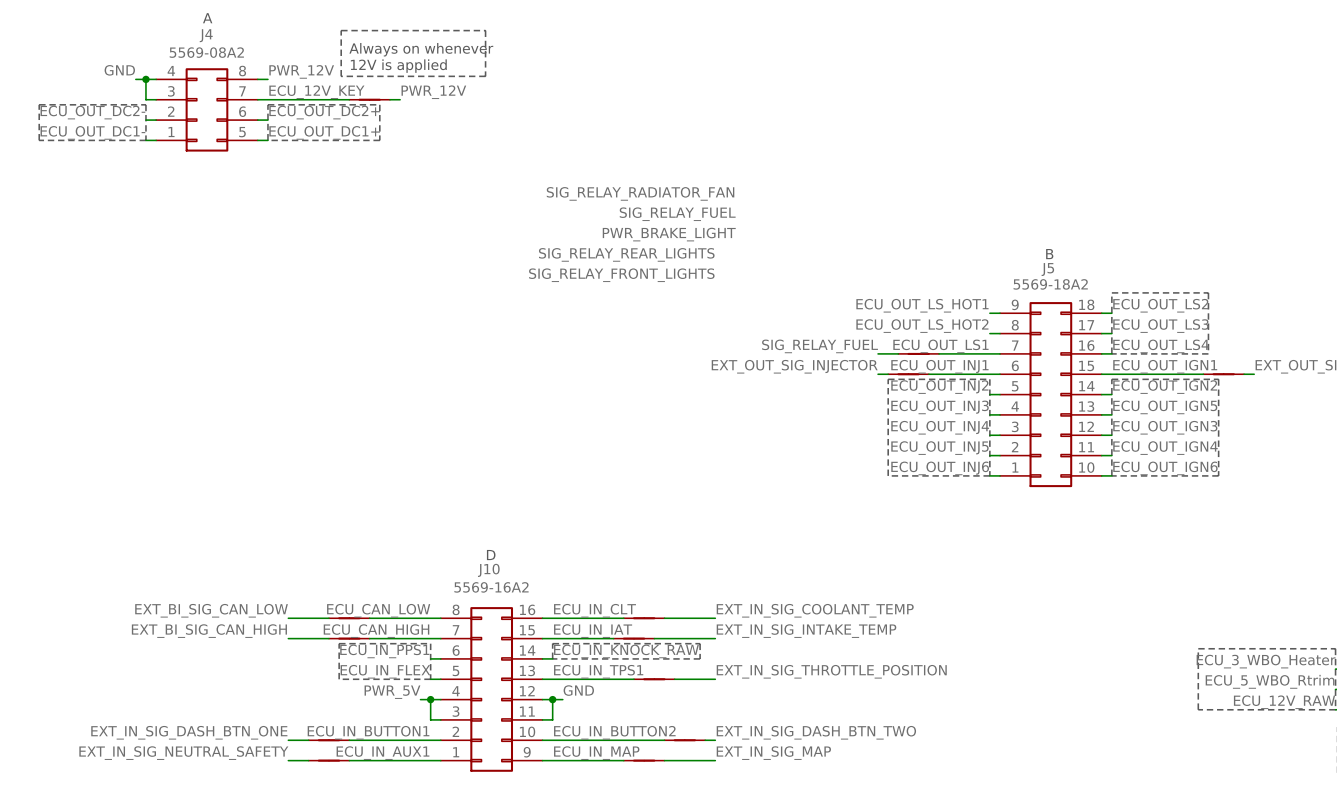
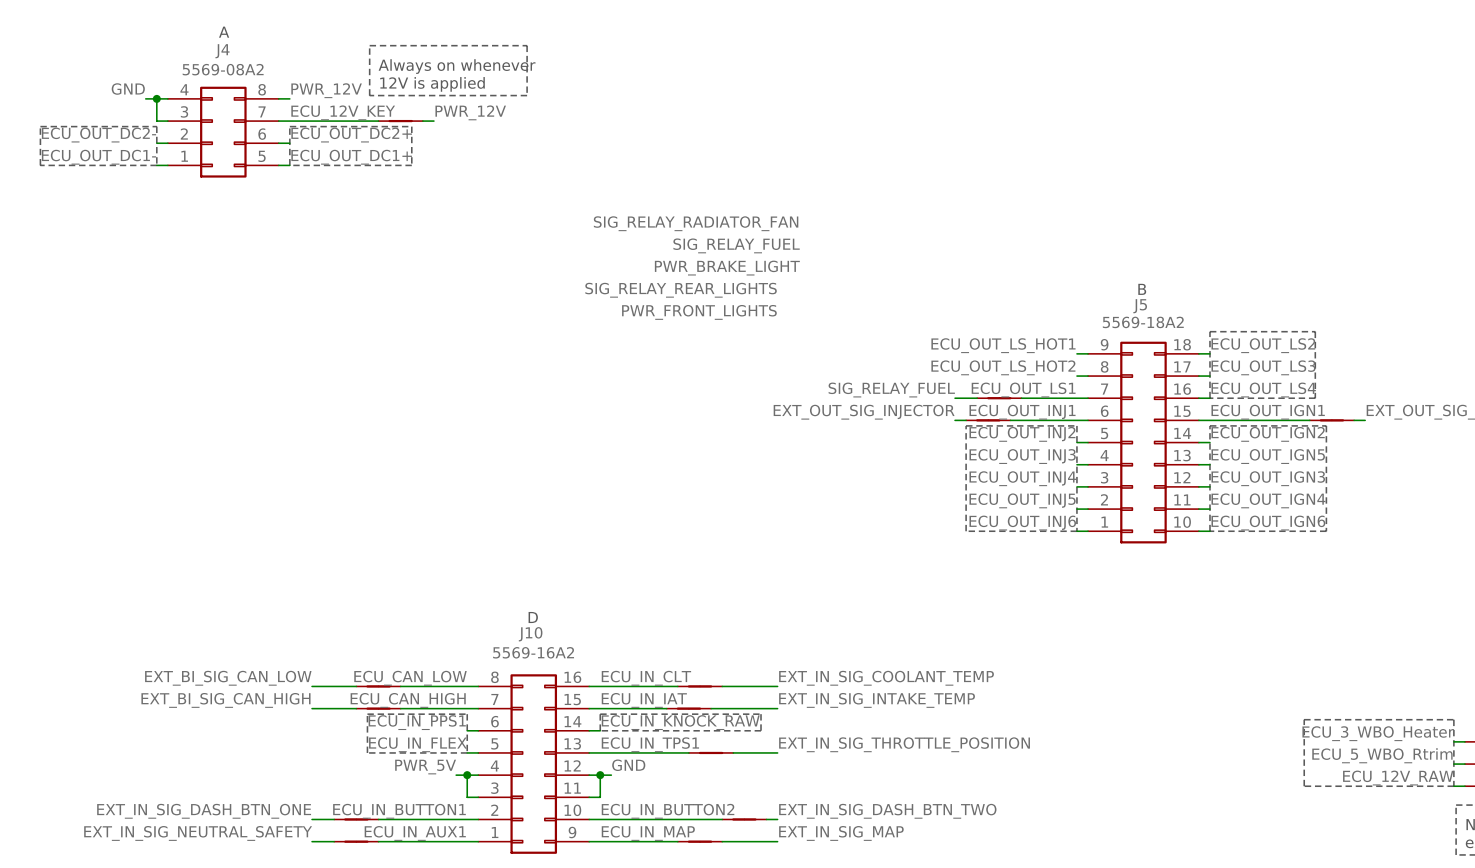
label: SIG_RELAY_FRONT_LIGHTS (621, 275) -> PWR_FRONT_LIGHTS (699, 312)

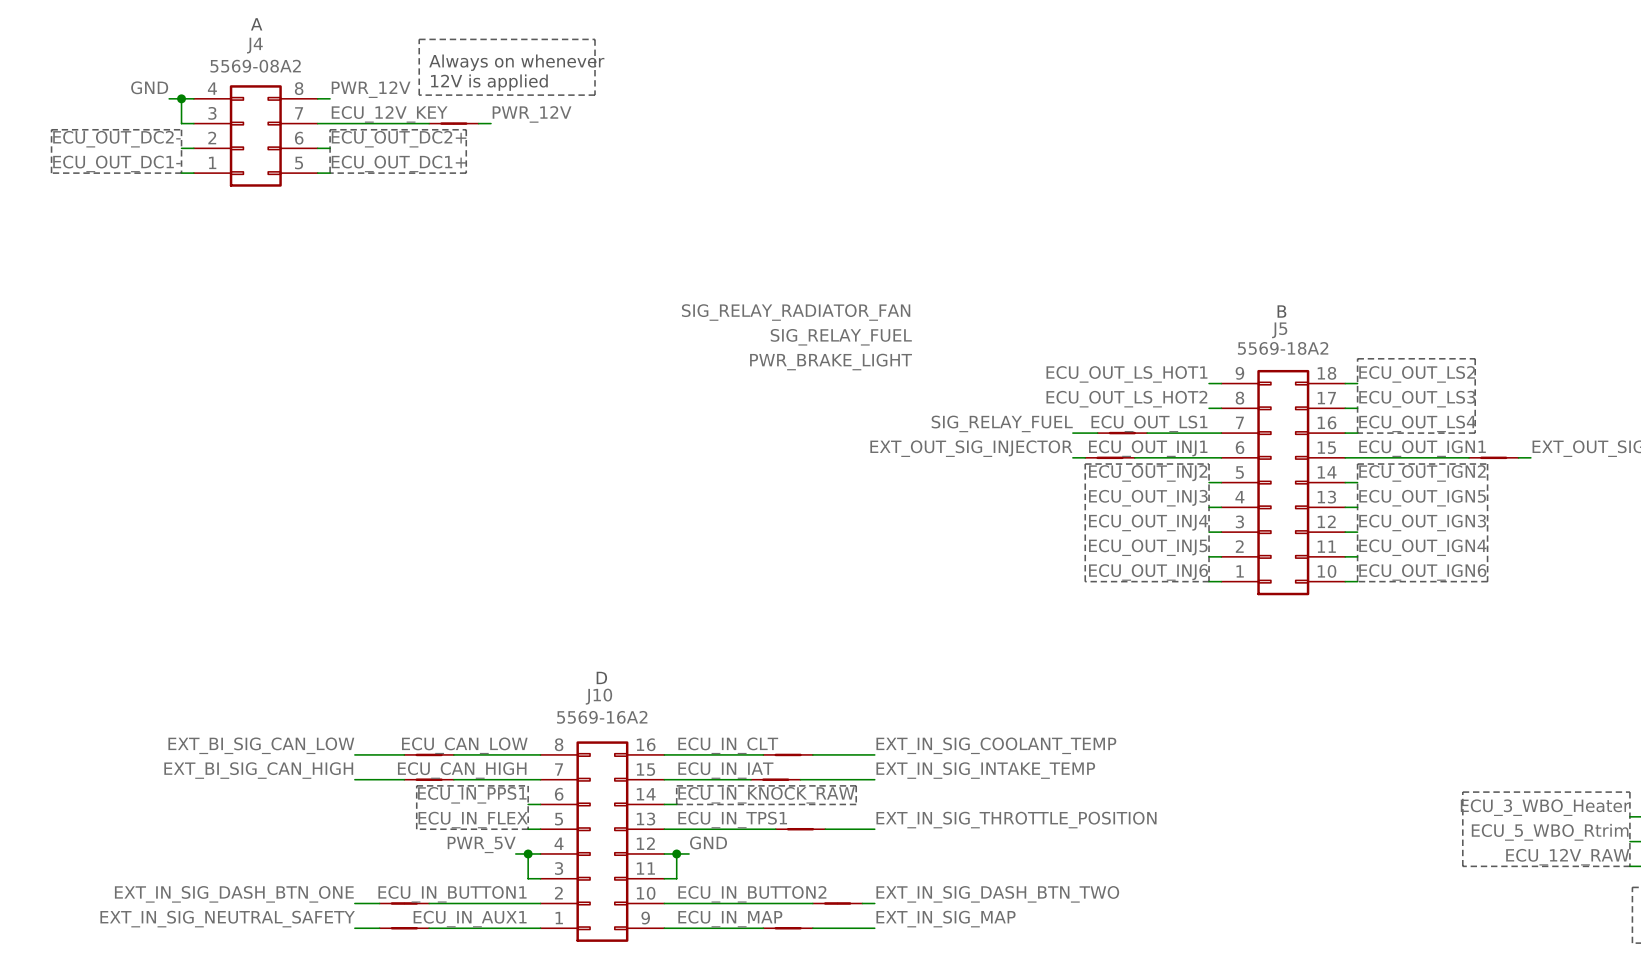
label position: SIG_RELAY_RADIATOR_FAN (696, 223) -> SIG_RELAY_RADIATOR_FAN (796, 312)
label position: SIG_RELAY_FUEL (736, 245) -> SIG_RELAY_FUEL (841, 337)
label position: PWR_BRAKE_LIGHT (727, 268) -> PWR_BRAKE_LIGHT (831, 362)
label: SIG_RELAY_REAR_LIGHTS (681, 290) -> none
label: PWR_FRONT_LIGHTS (699, 312) -> none

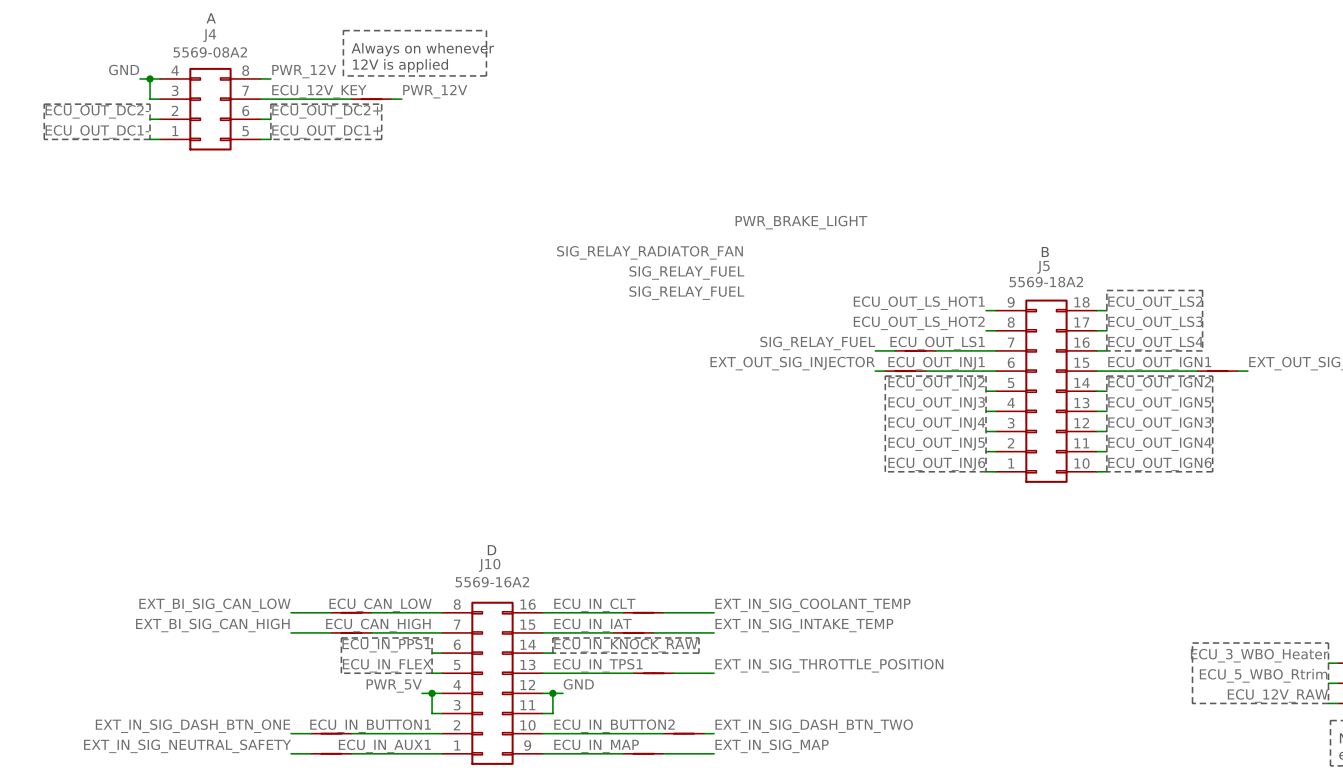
label: none -> PWR_BRAKE_LIGHT (801, 222)
label: PWR_BRAKE_LIGHT (831, 362) -> SIG_RELAY_FUEL (686, 293)

